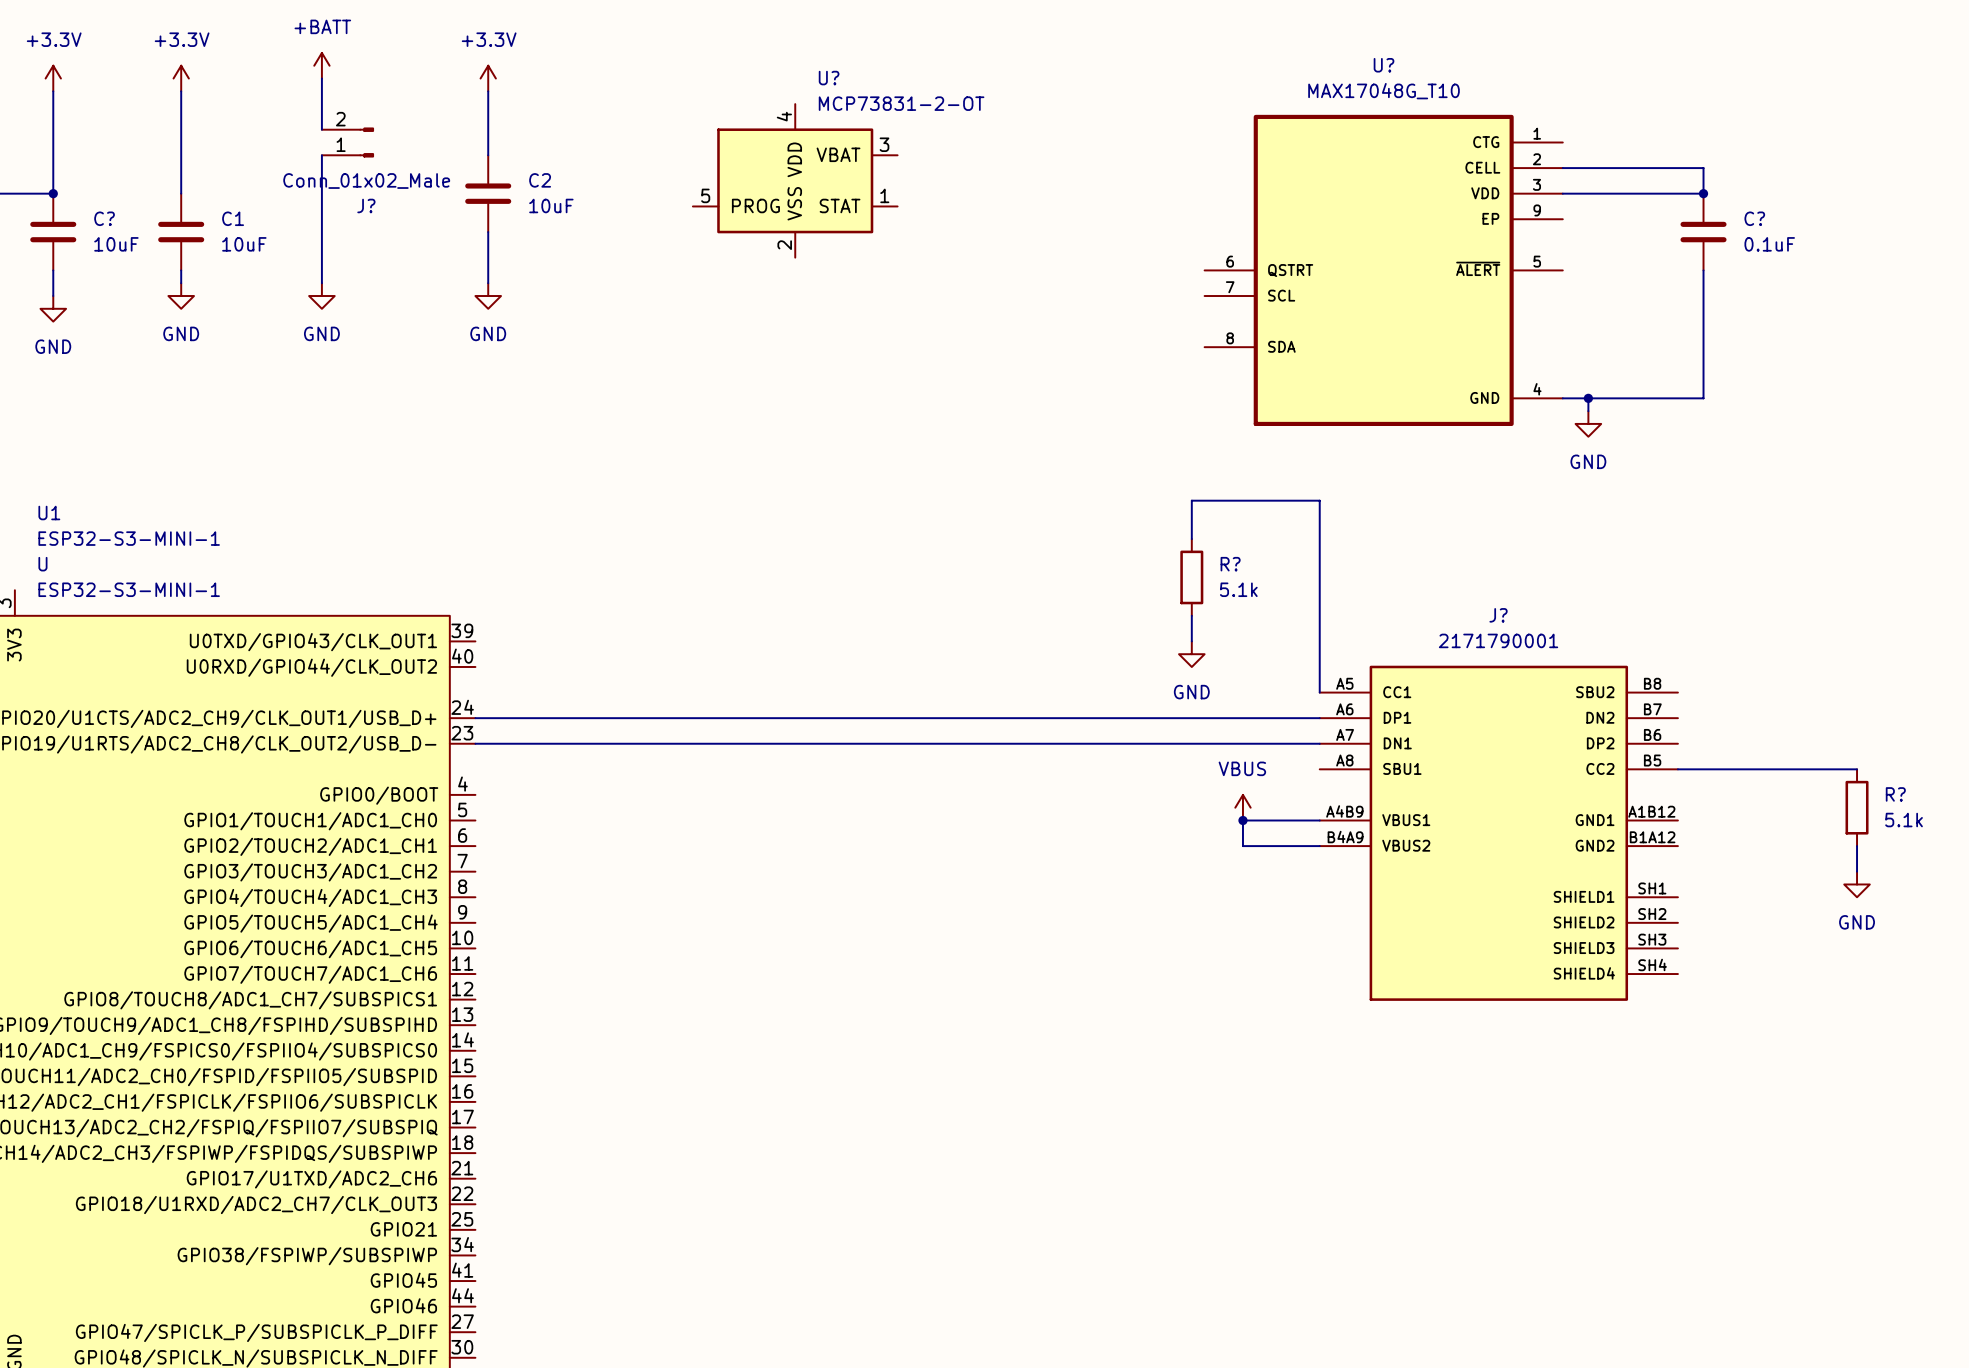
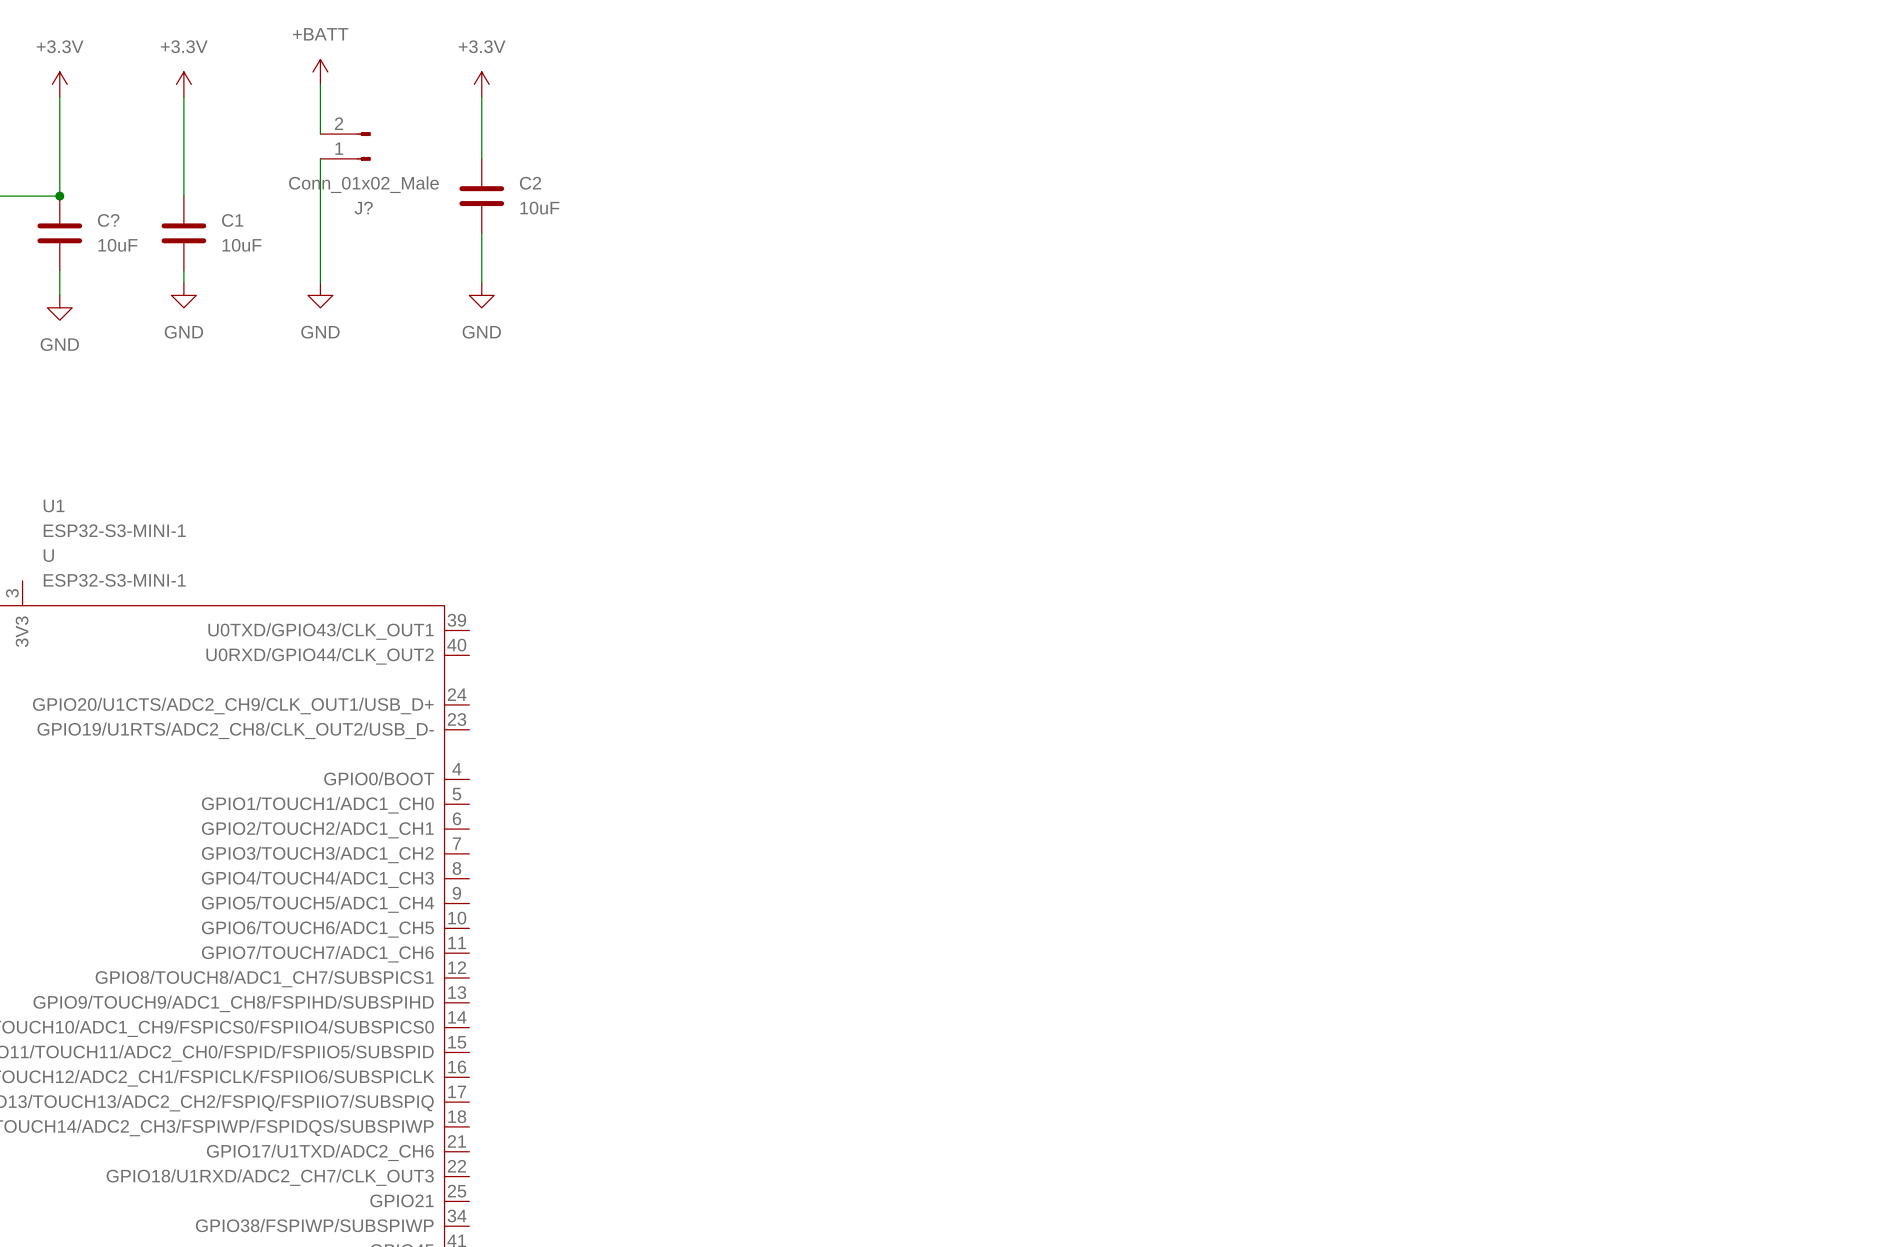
wire: (1562, 168) (1703, 168) (1703, 193) (1562, 193) -> none
U?: MCP73831-2-OT (795, 180) -> none
junction: (1703, 193) -> none
C?: 0.1uF (1703, 232) -> none
U?: MAX17048G_T10 (1383, 270) -> none
wire: (1703, 270) (1703, 398) (1562, 398) -> none
wire: (1588, 398) (1588, 411) -> none
junction: (1588, 398) -> none
power symbol: GND (1588, 423) -> none
wire: (1191, 539) (1191, 500) (1319, 500) (1319, 692) -> none
R?: 5.1k (1191, 577) -> none
wire: (1191, 615) (1191, 641) -> none
power symbol: GND (1191, 654) -> none
wire: (475, 718) (1319, 718) -> none
wire: (475, 743) (1319, 743) -> none
wire: (1677, 769) (1857, 769) -> none
power symbol: VBUS (1242, 807) -> none
R?: 5.1k (1857, 807) -> none
junction: (1242, 820) -> none
wire: (1319, 820) (1242, 820) (1242, 846) (1319, 846) -> none
J?: 2171790001 (1498, 833) -> none
wire: (1857, 846) (1857, 871) -> none
power symbol: GND (1857, 884) -> none

